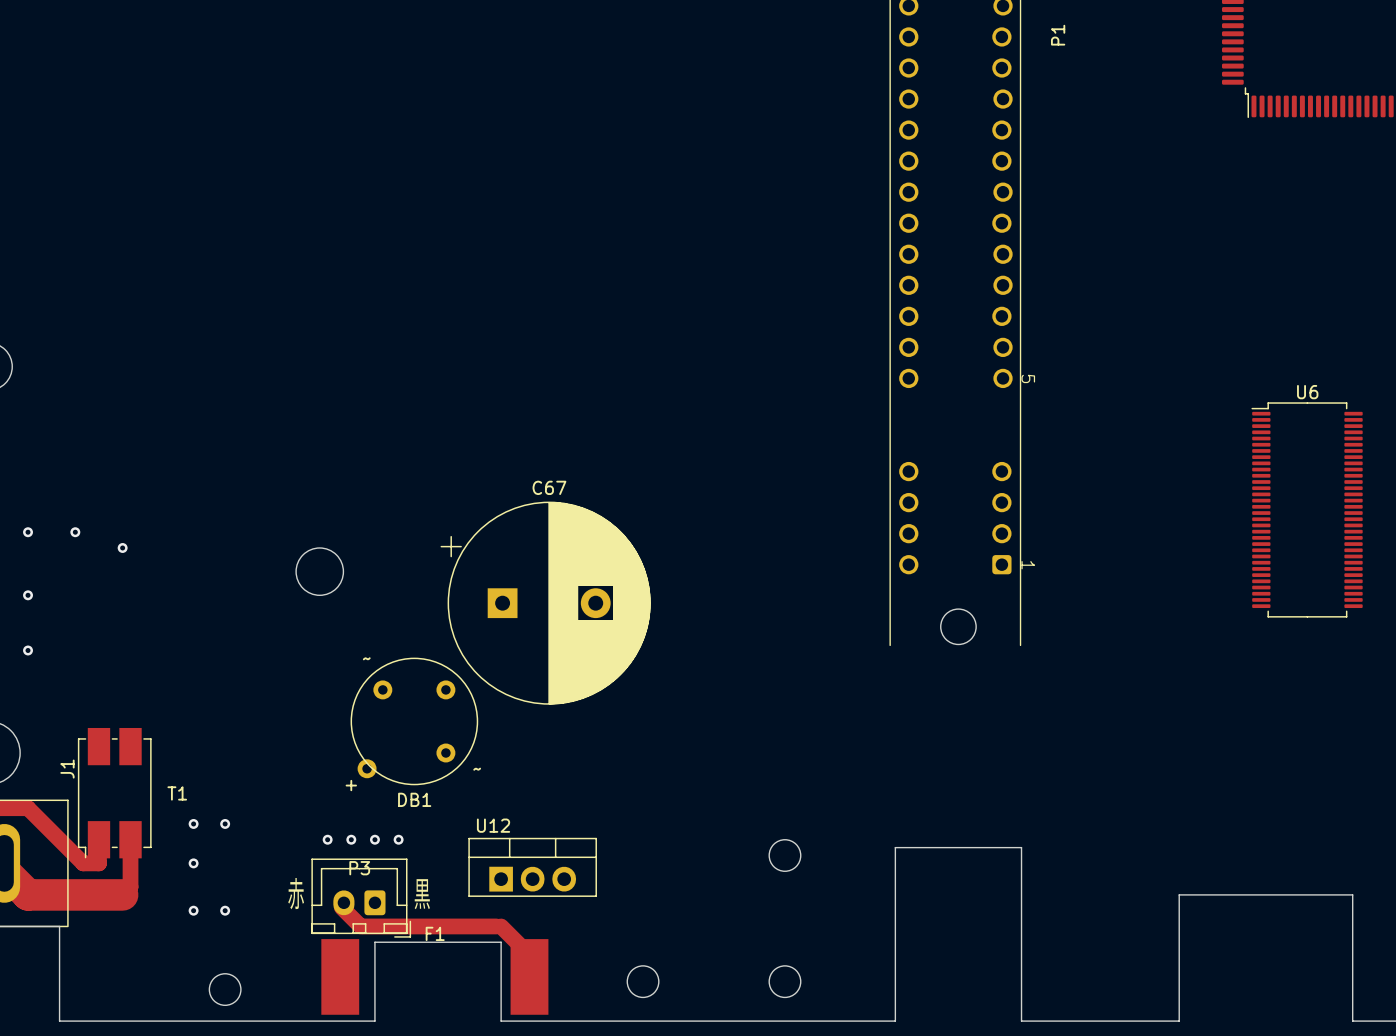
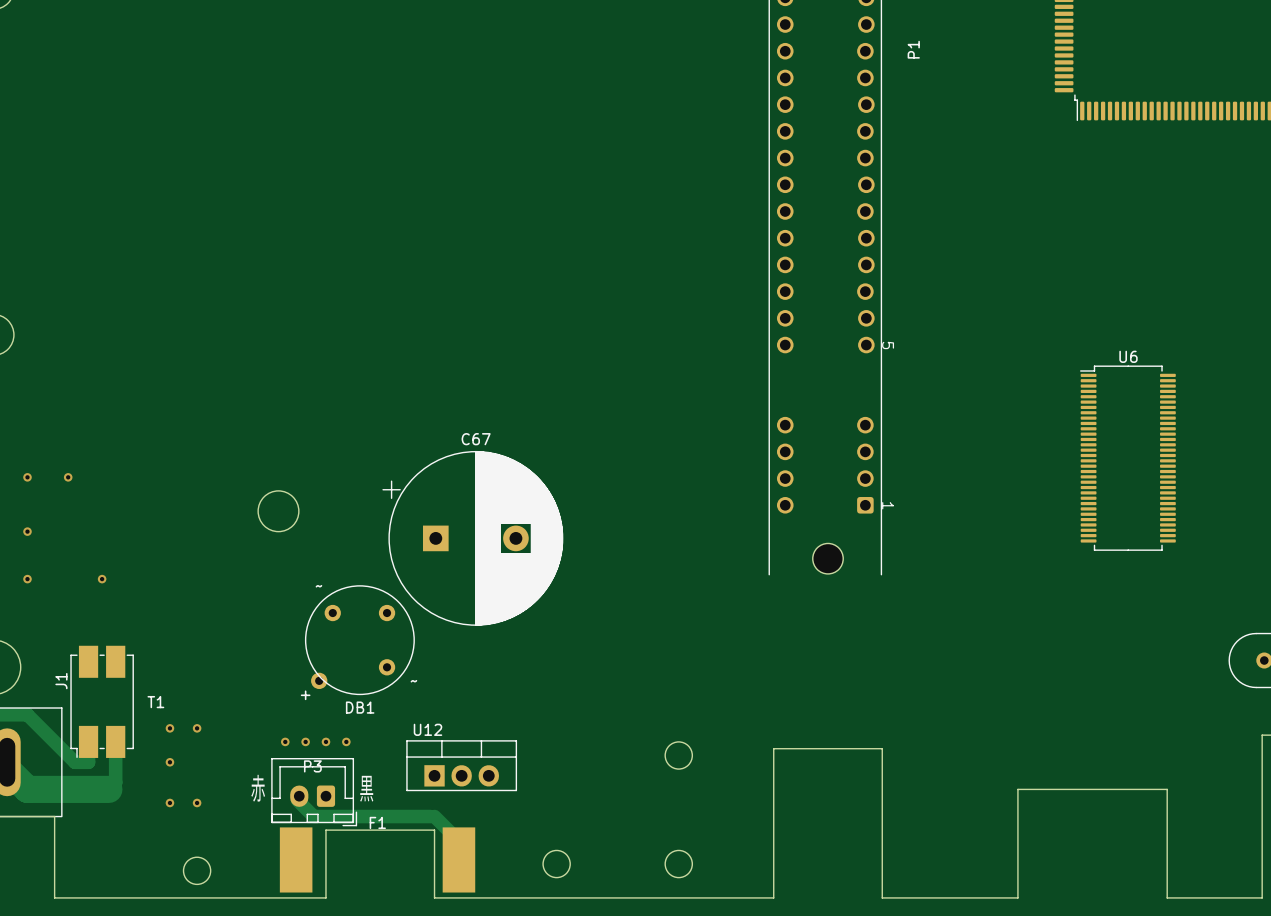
via: (122, 547) -> none
via: none -> (102, 579)

